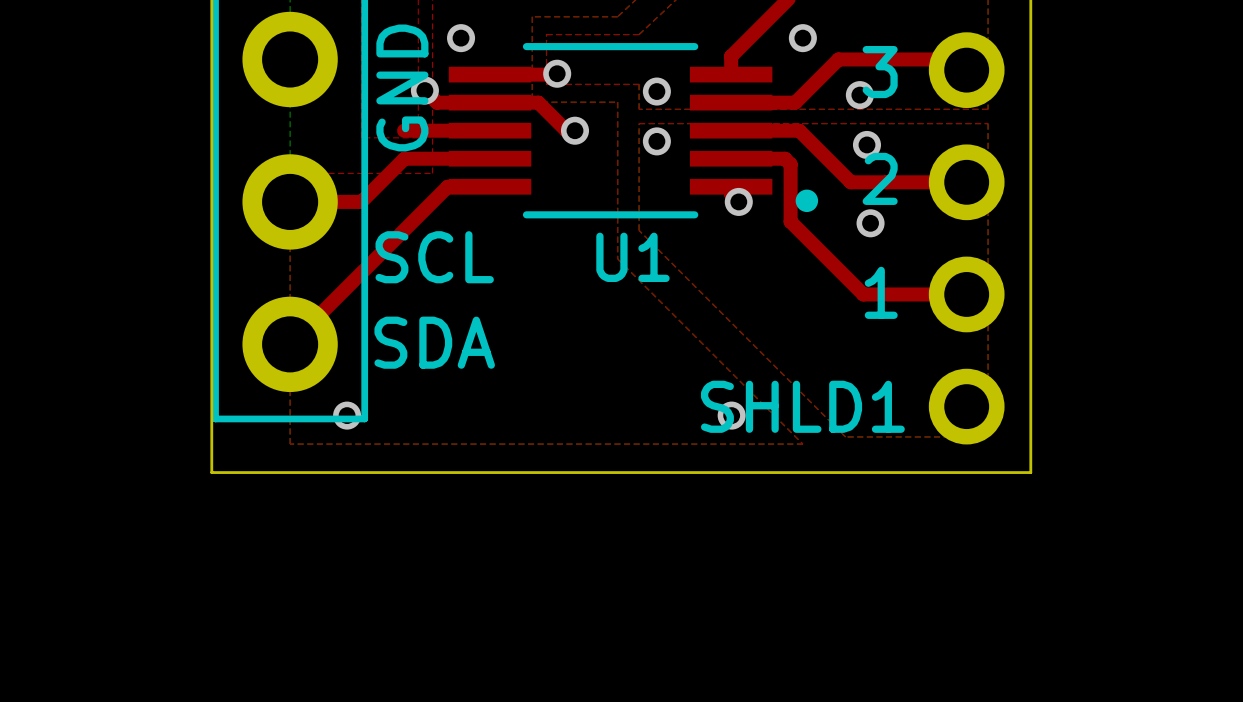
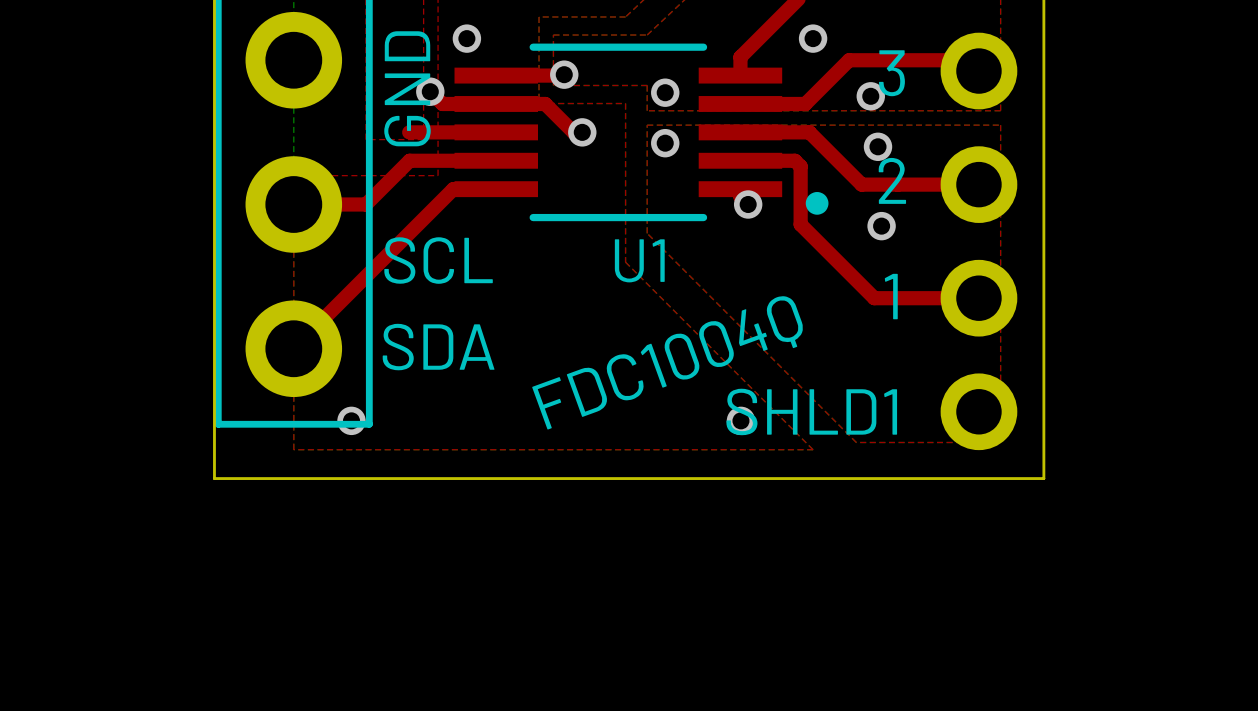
text: none -> FDC1004Q (667, 362)

